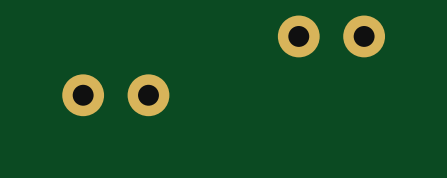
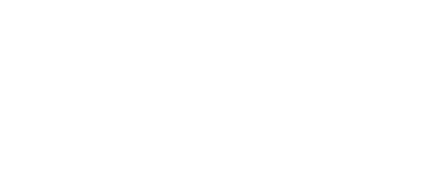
part: (331, 36) -> none
part: (115, 95) -> none

